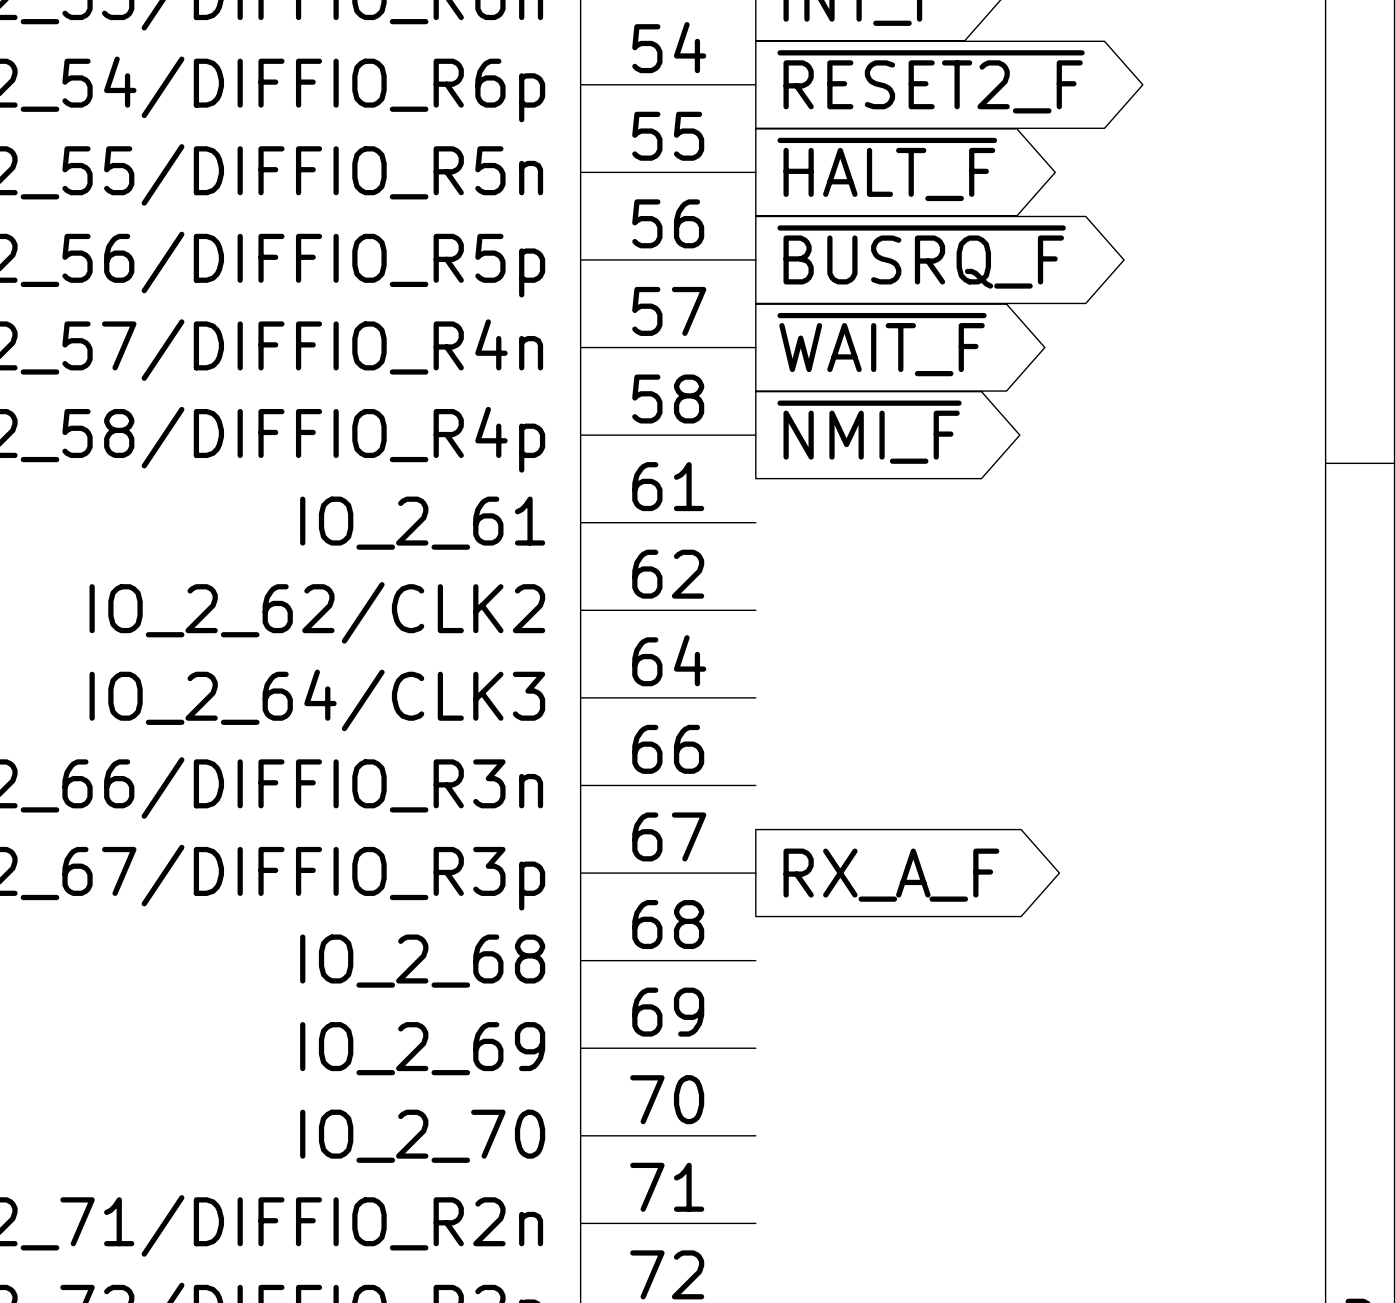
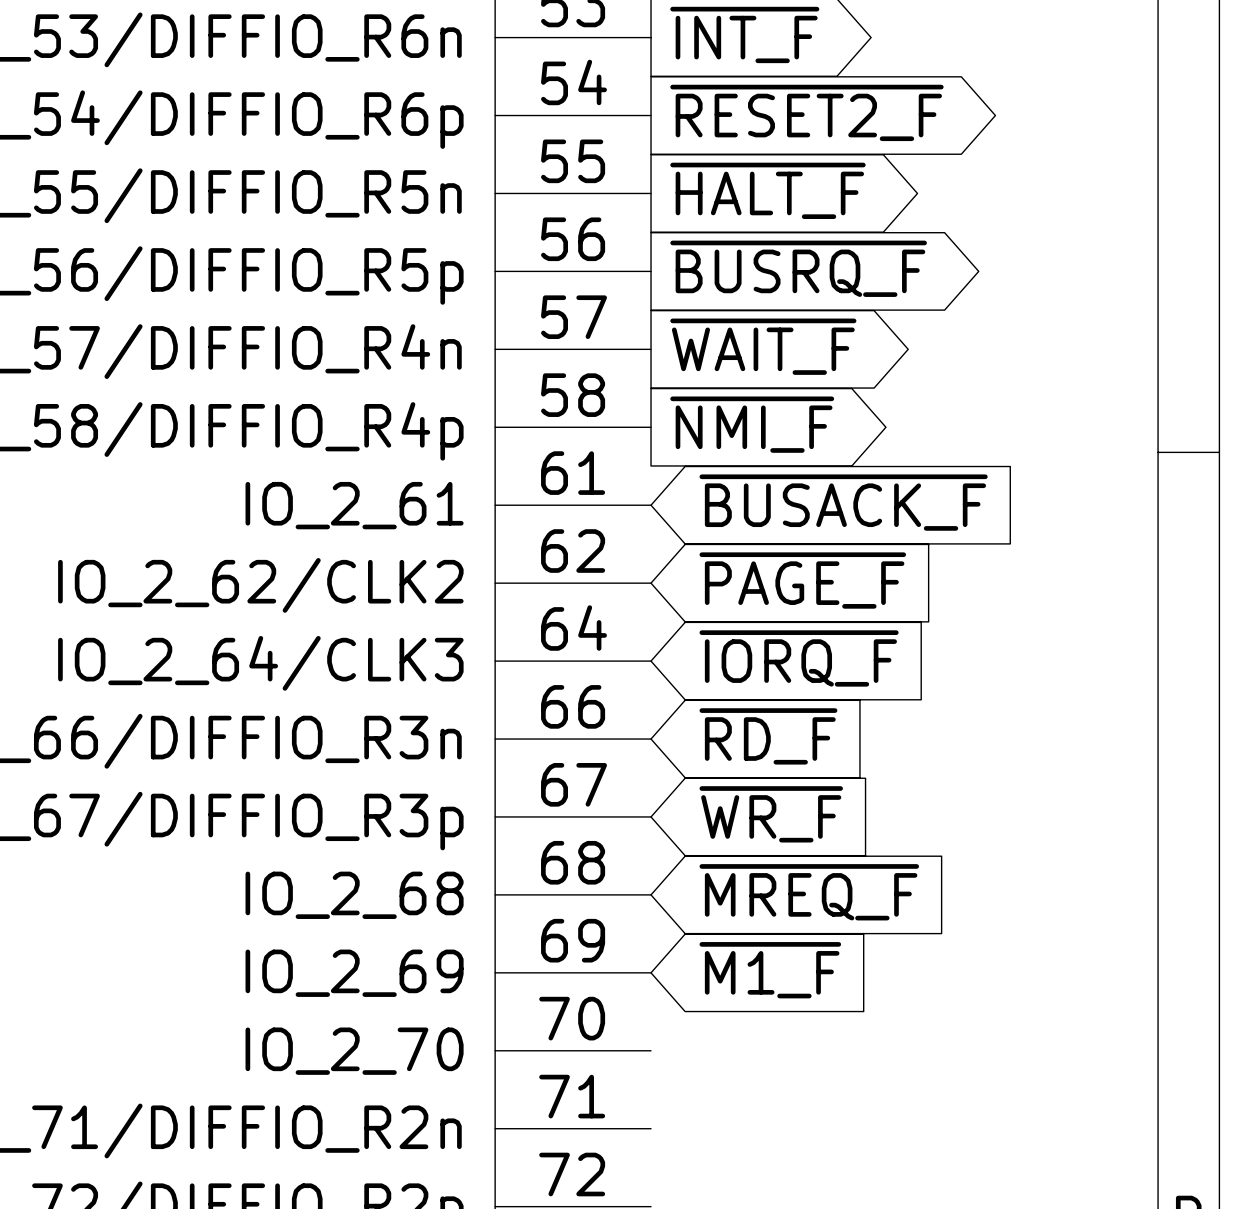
global label: none -> ~{BUSACK_F} (843, 502)
global label: none -> ~{PAGE_F} (802, 580)
global label: none -> ~{IORQ_F} (799, 658)
global label: none -> ~{RD_F} (768, 736)
global label shape: output (891, 875) -> input (771, 814)
global label: RX_A_F (891, 875) -> ~{WR_F} (771, 814)
global label: none -> ~{MREQ_F} (809, 892)
global label: none -> ~{M1_F} (770, 970)

